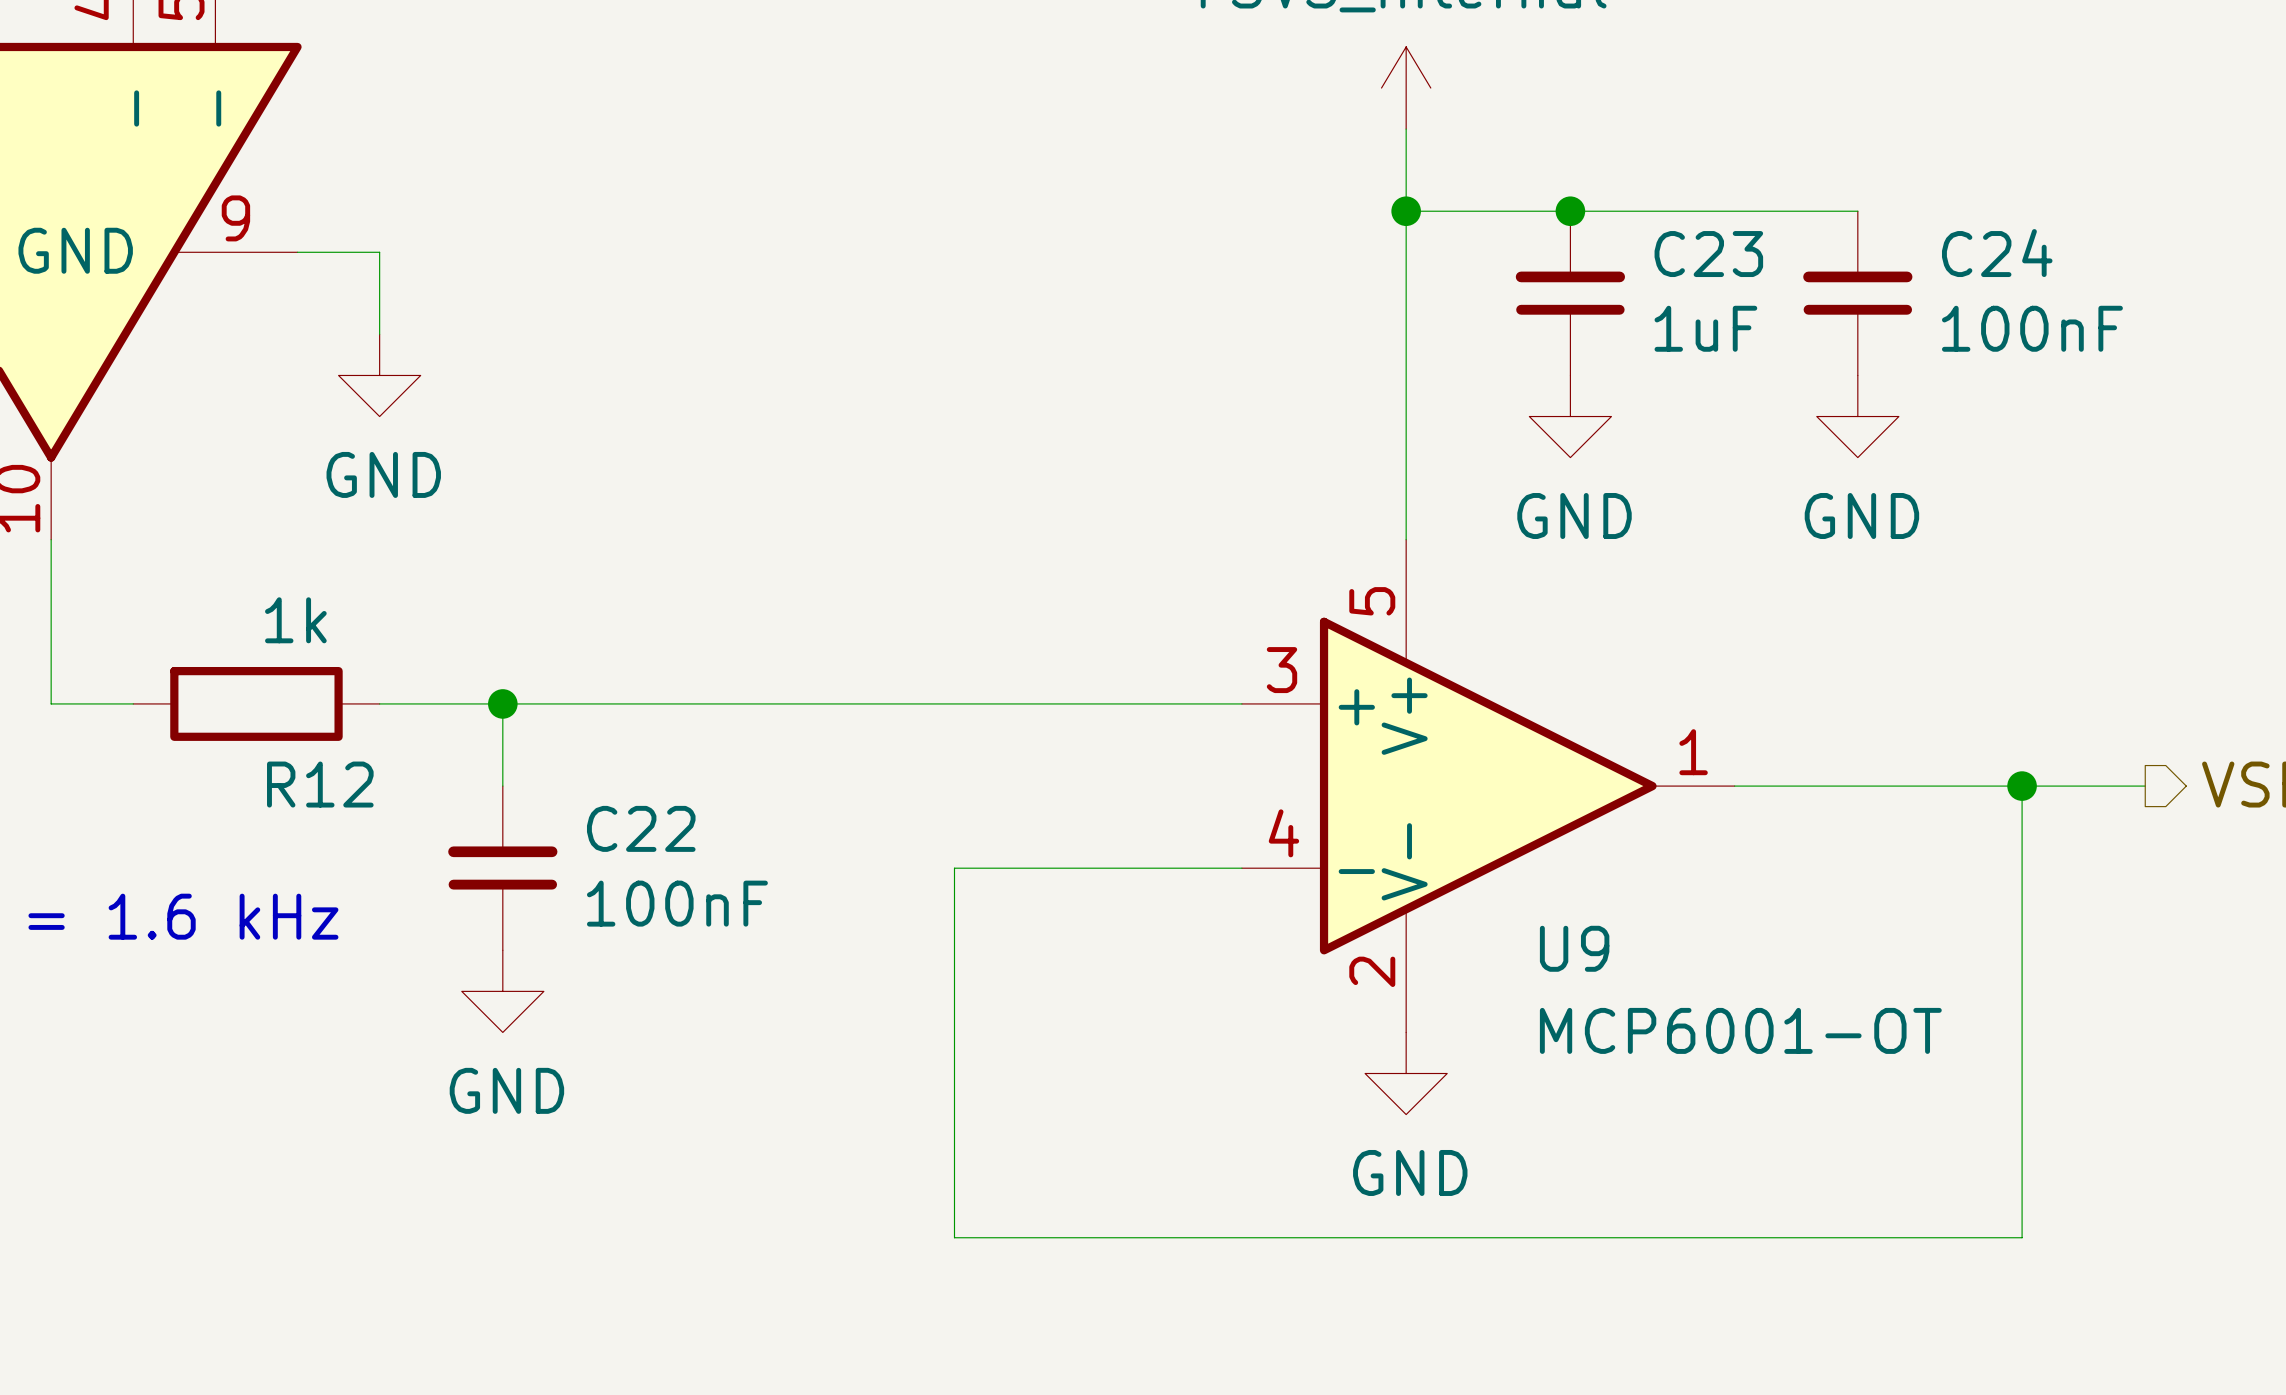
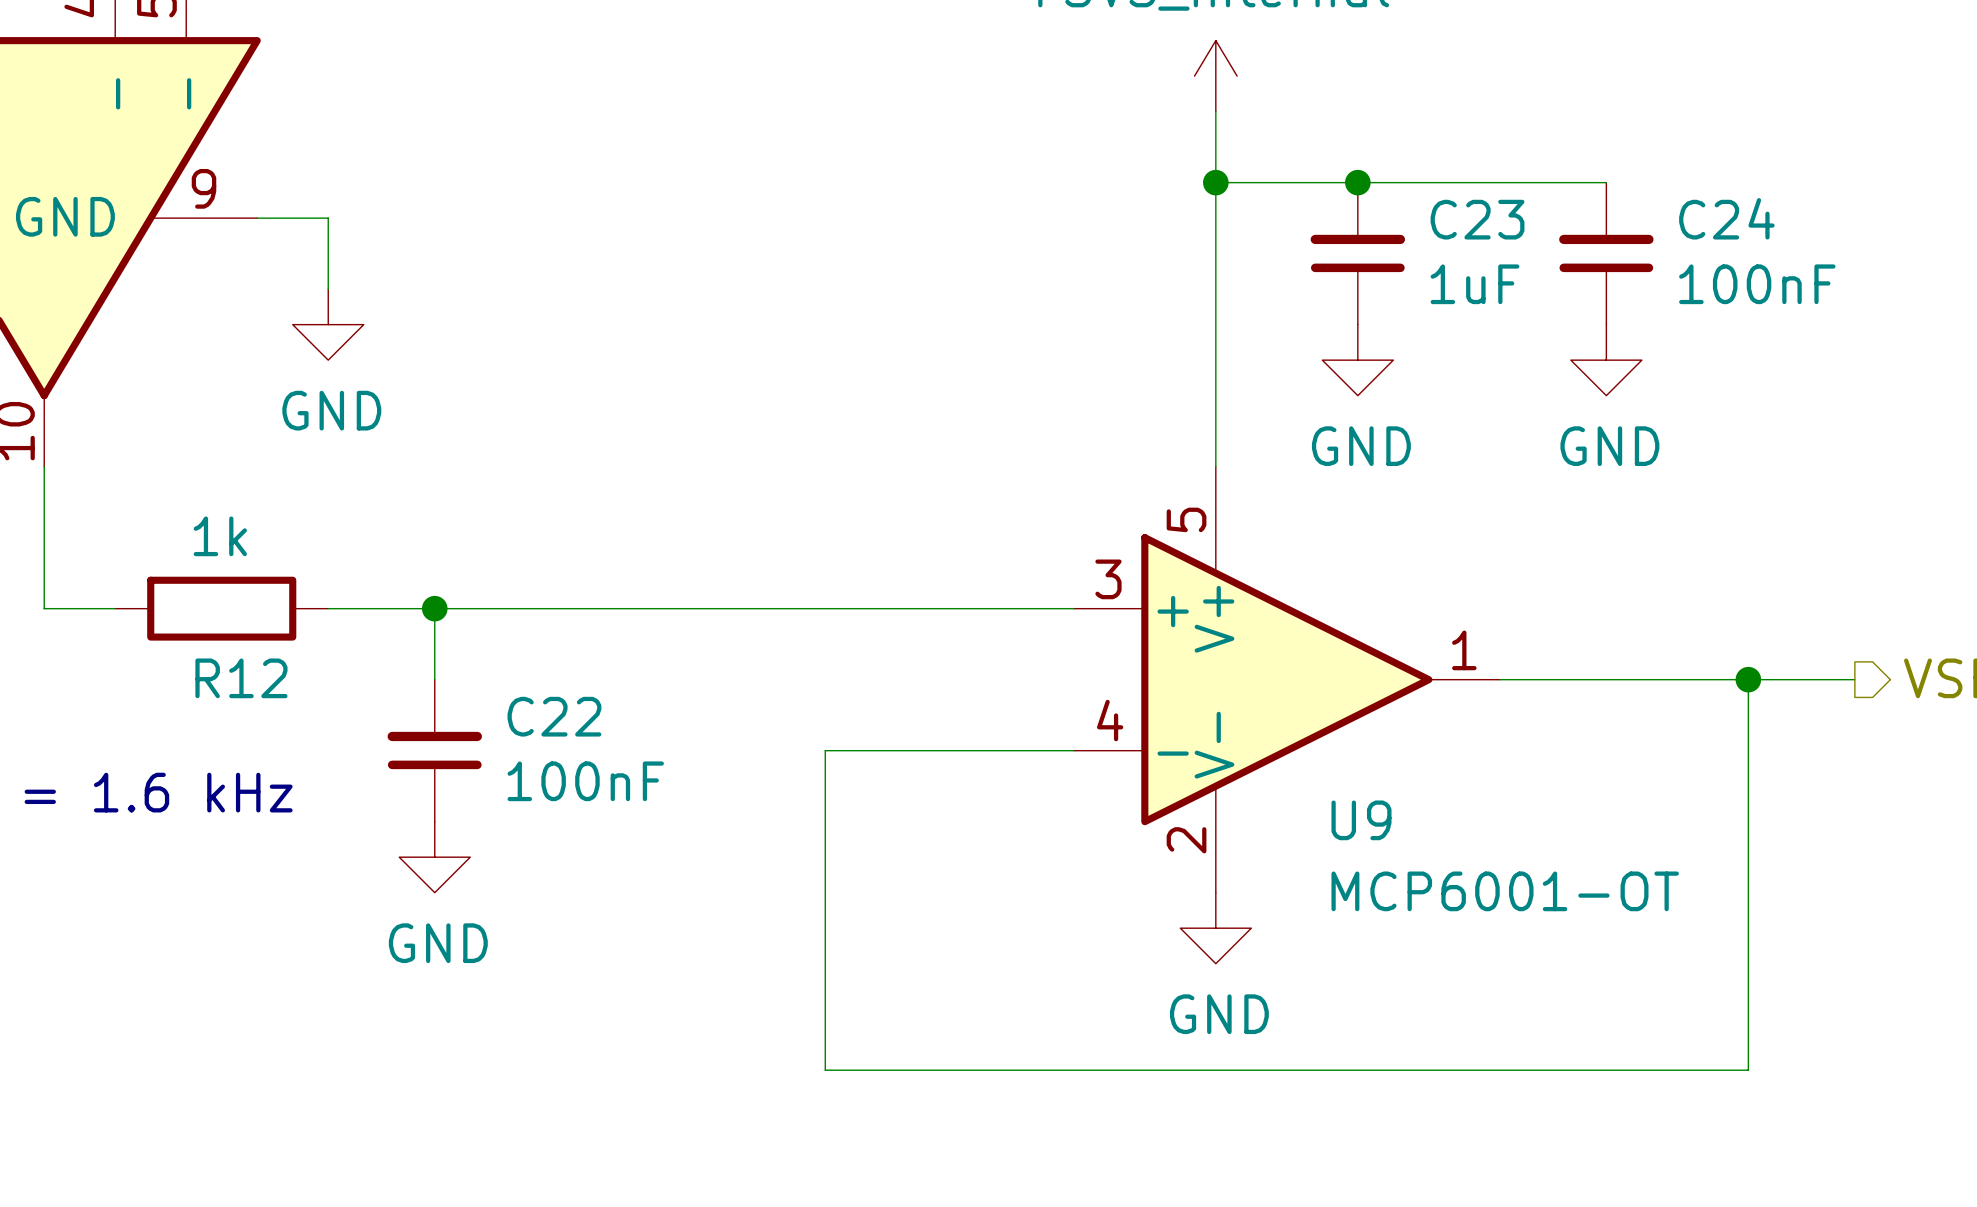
R12 value position: 1k (295, 620) -> 1k (220, 536)
R12 name position: R12 (320, 784) -> R12 (241, 678)

